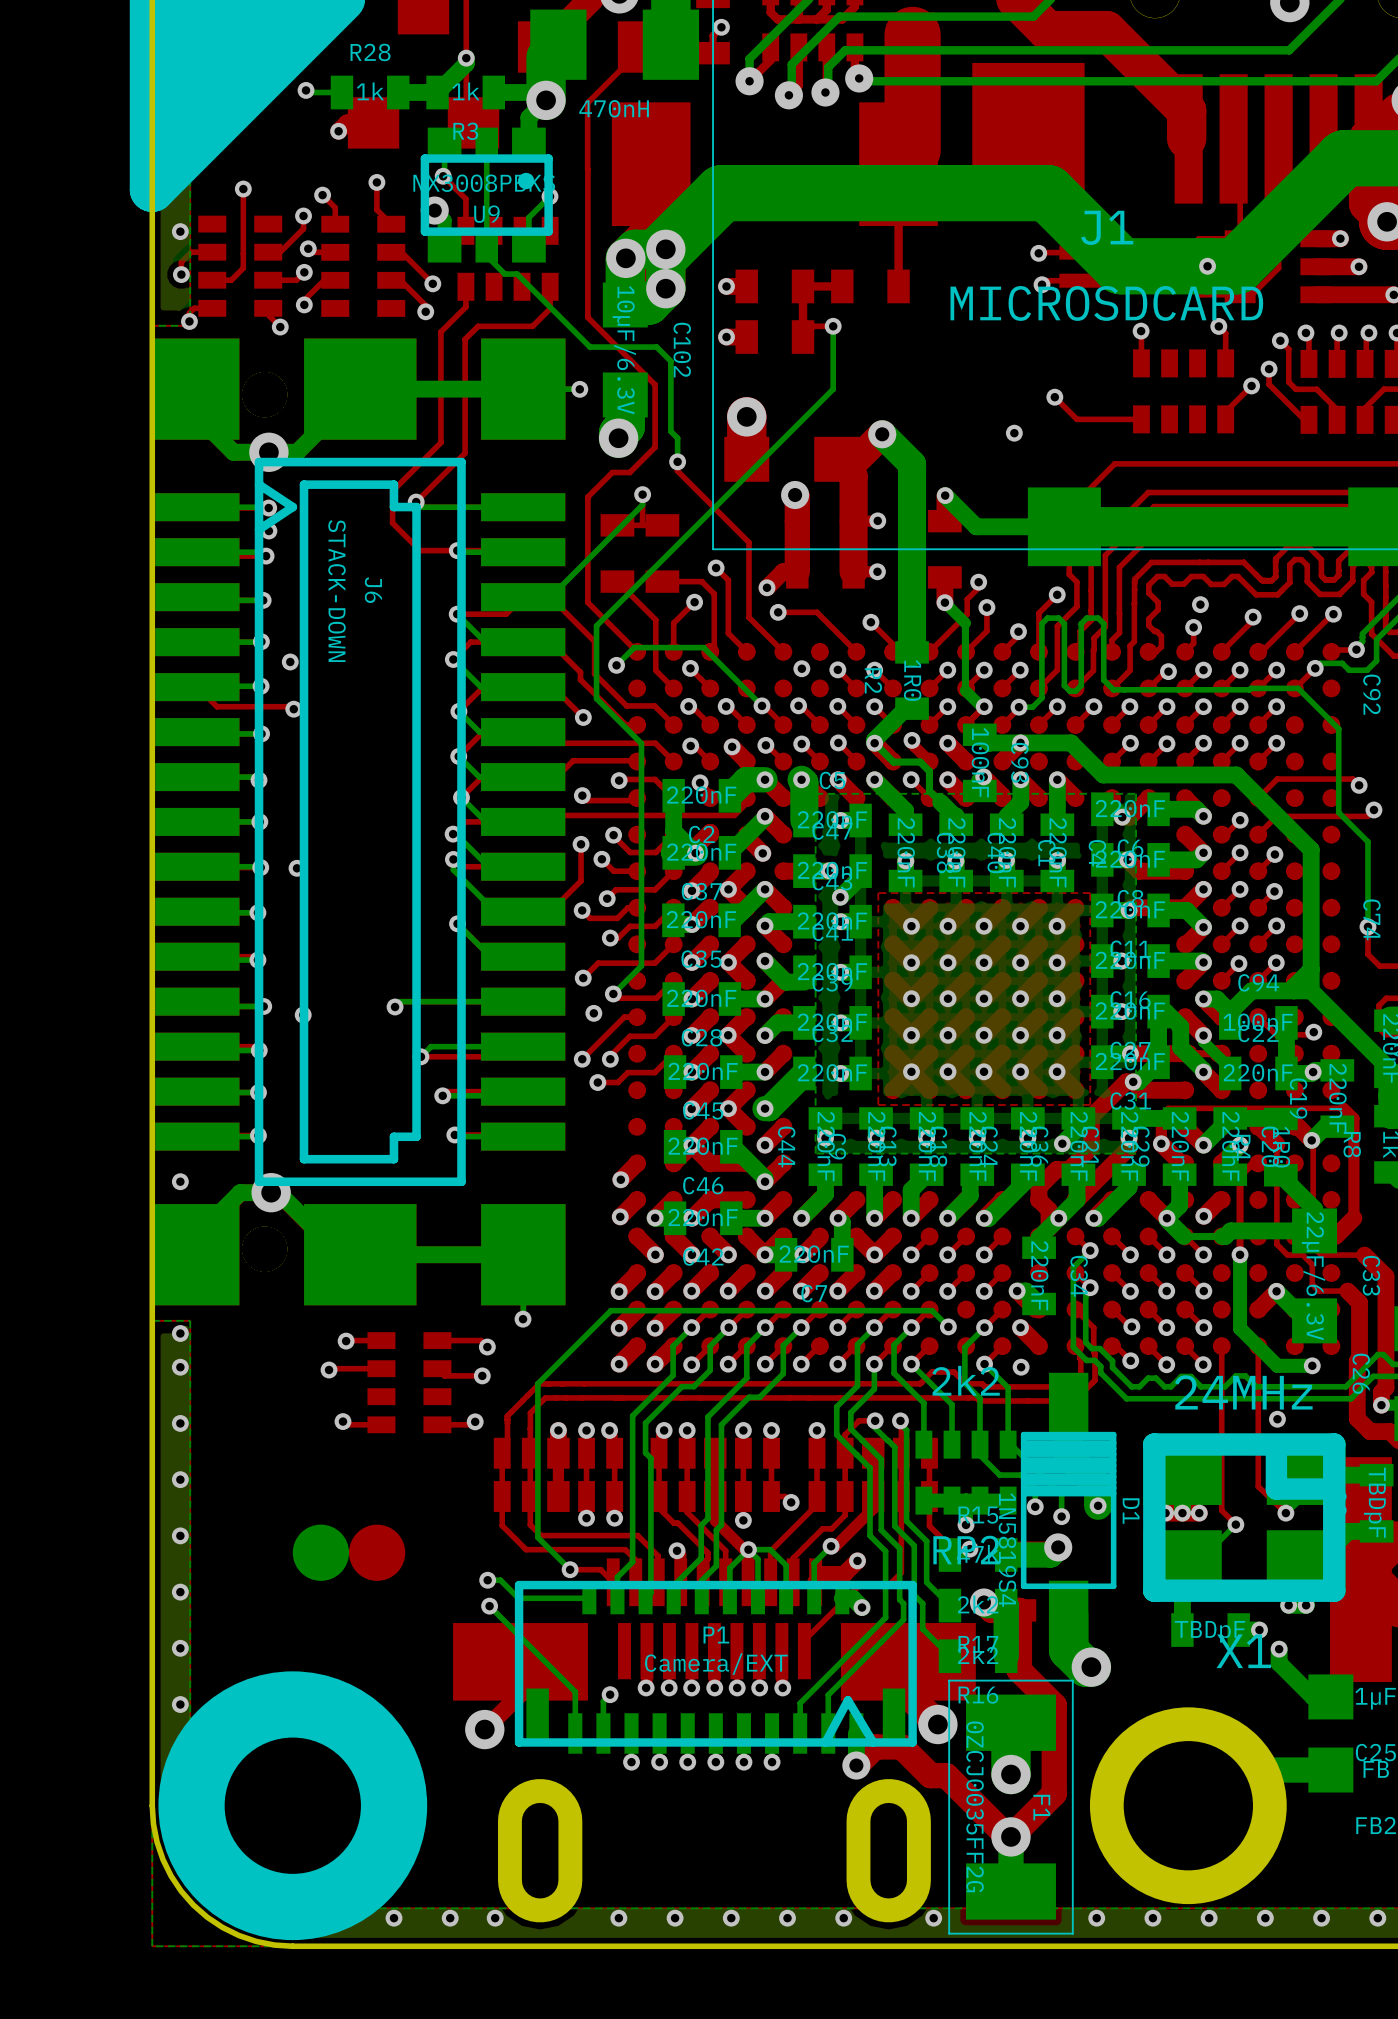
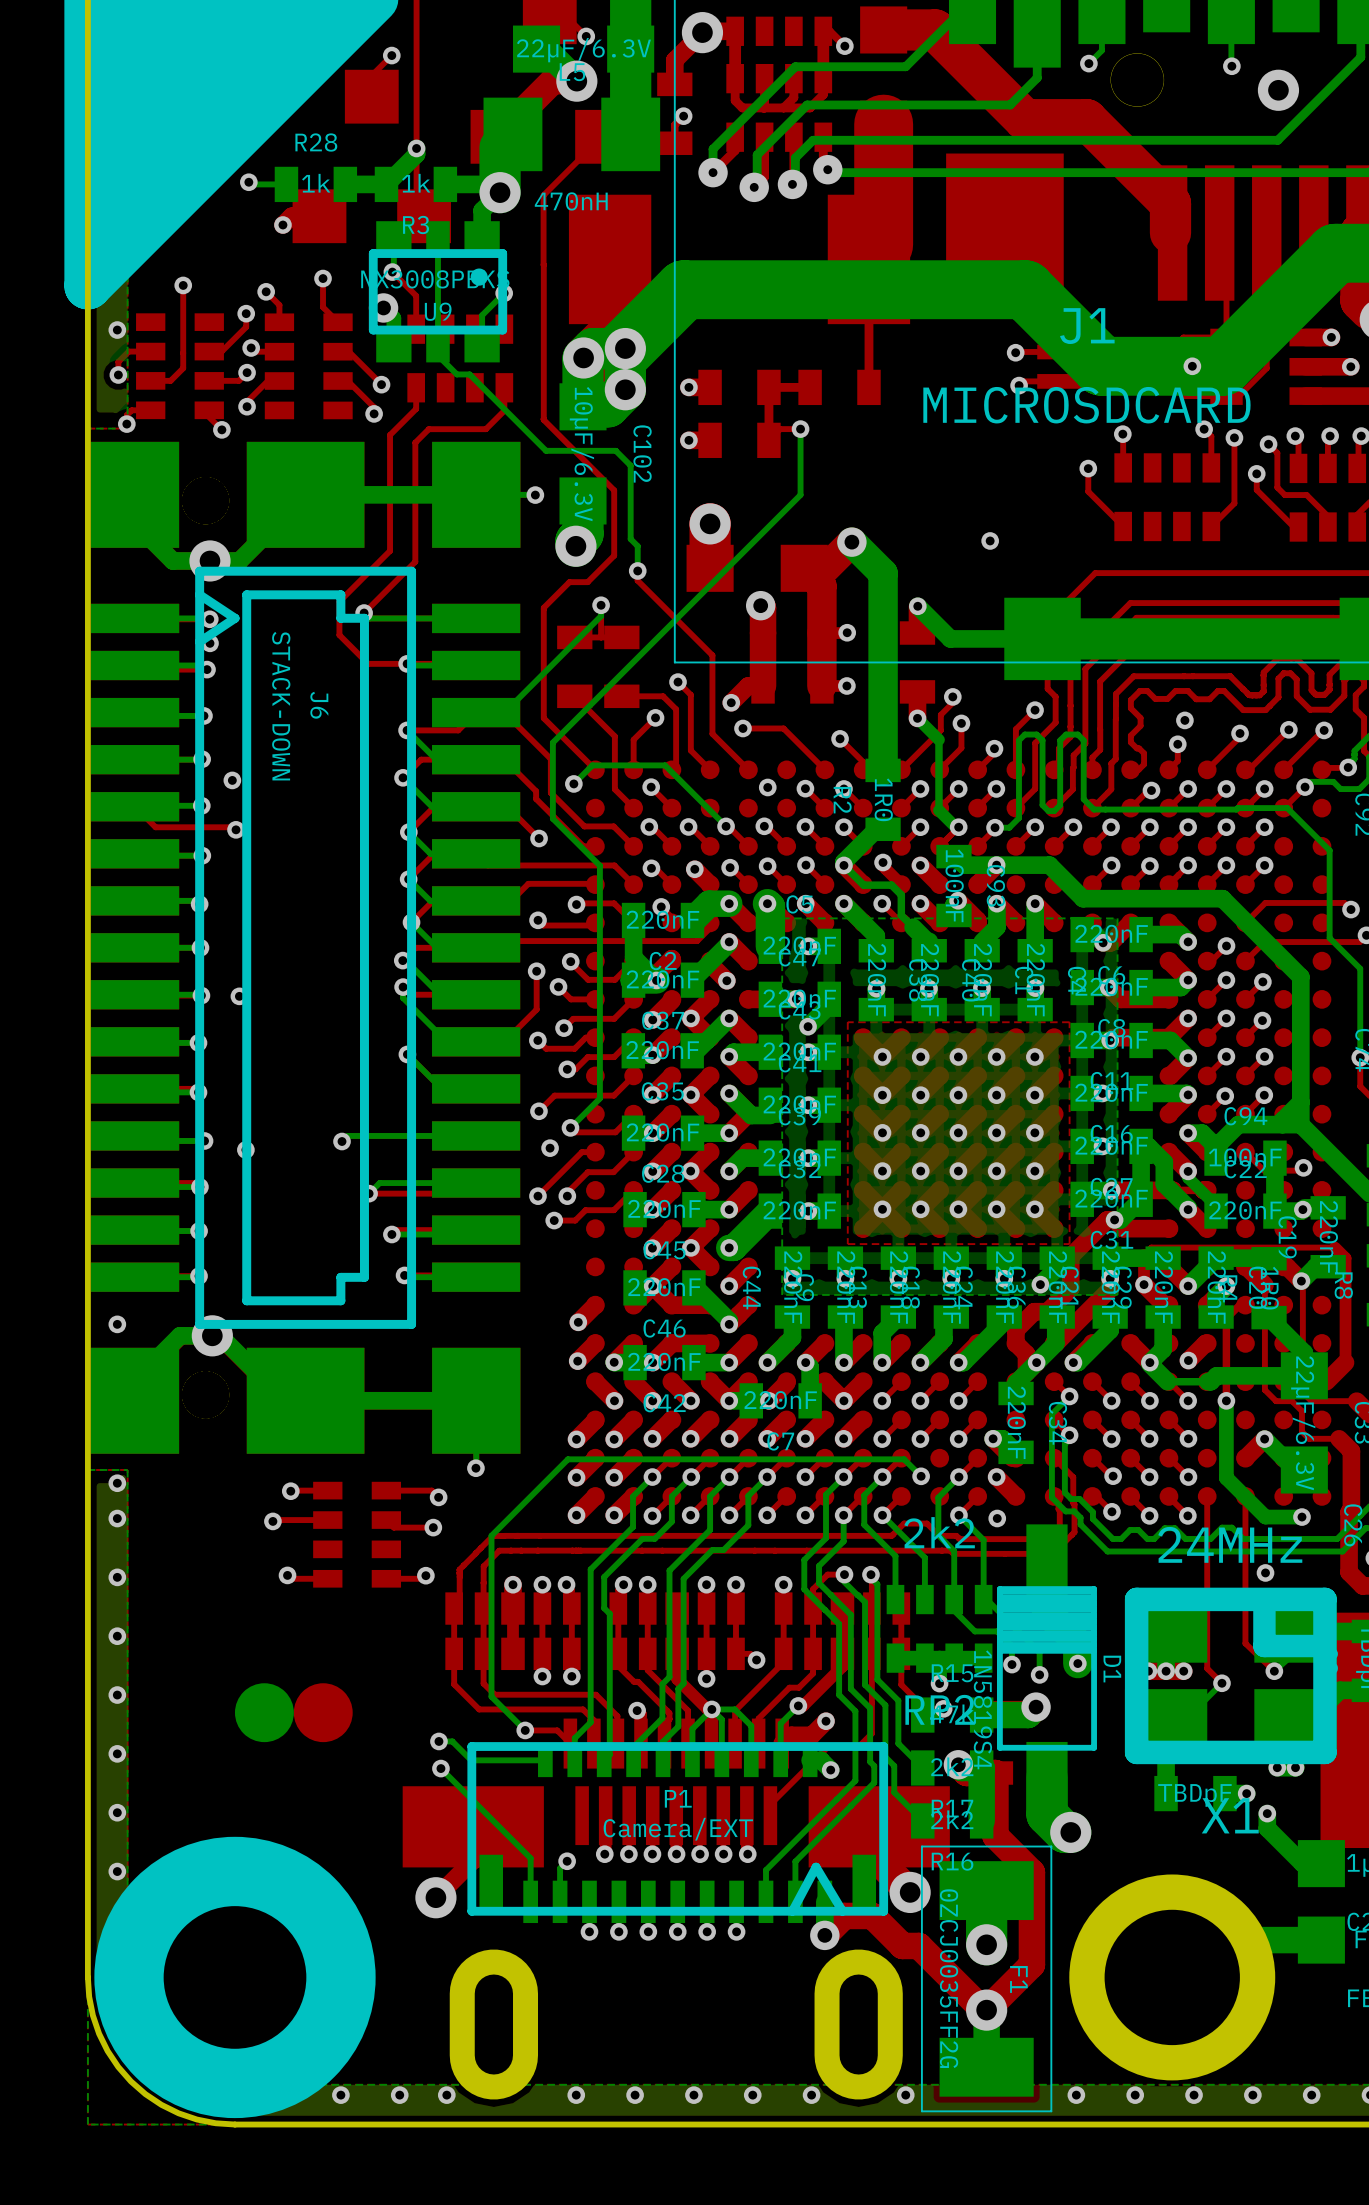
top track: (1251, 385) (1225, 411) (1225, 419) -> (1234, 437) (1234, 503) (1211, 526)
via position: (1251, 385) -> (1234, 437)
top track: (1054, 397) (1076, 419) (1141, 419) -> (1088, 468) (1088, 491) (1123, 526)
via position: (1054, 397) -> (1088, 468)

